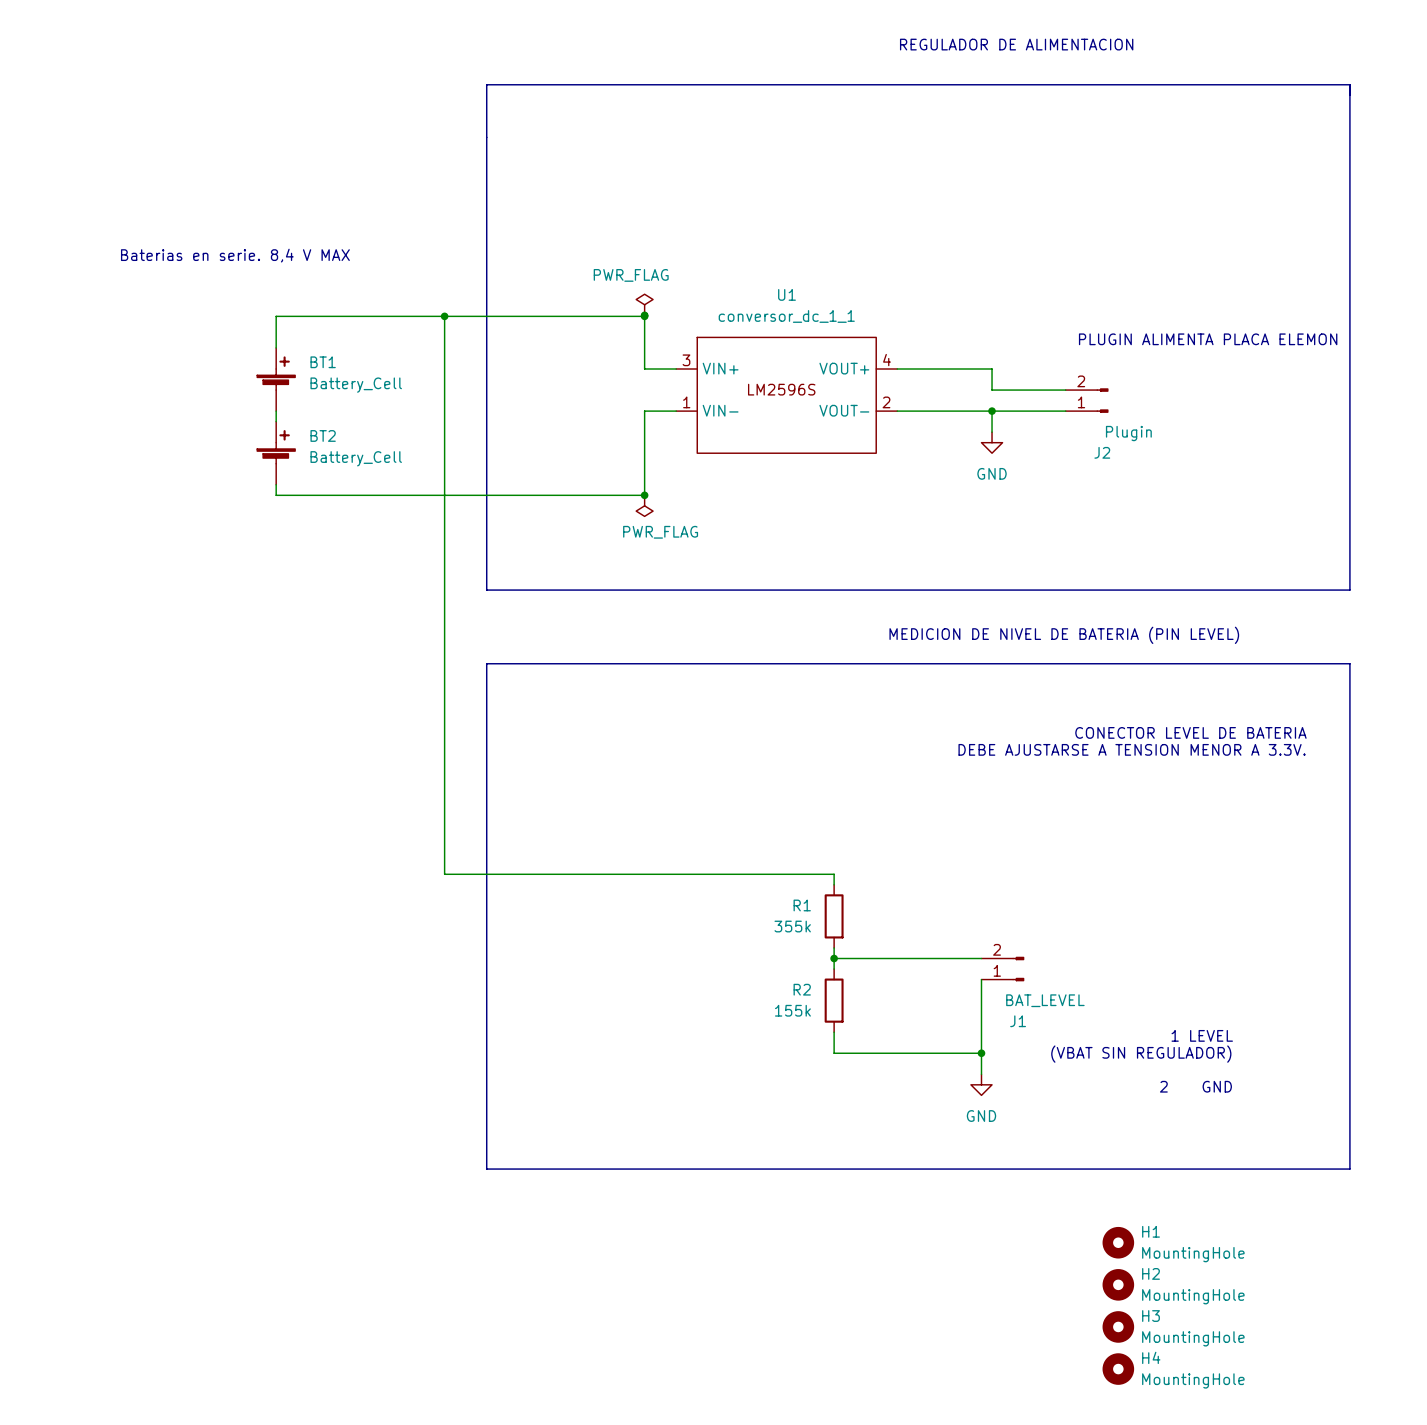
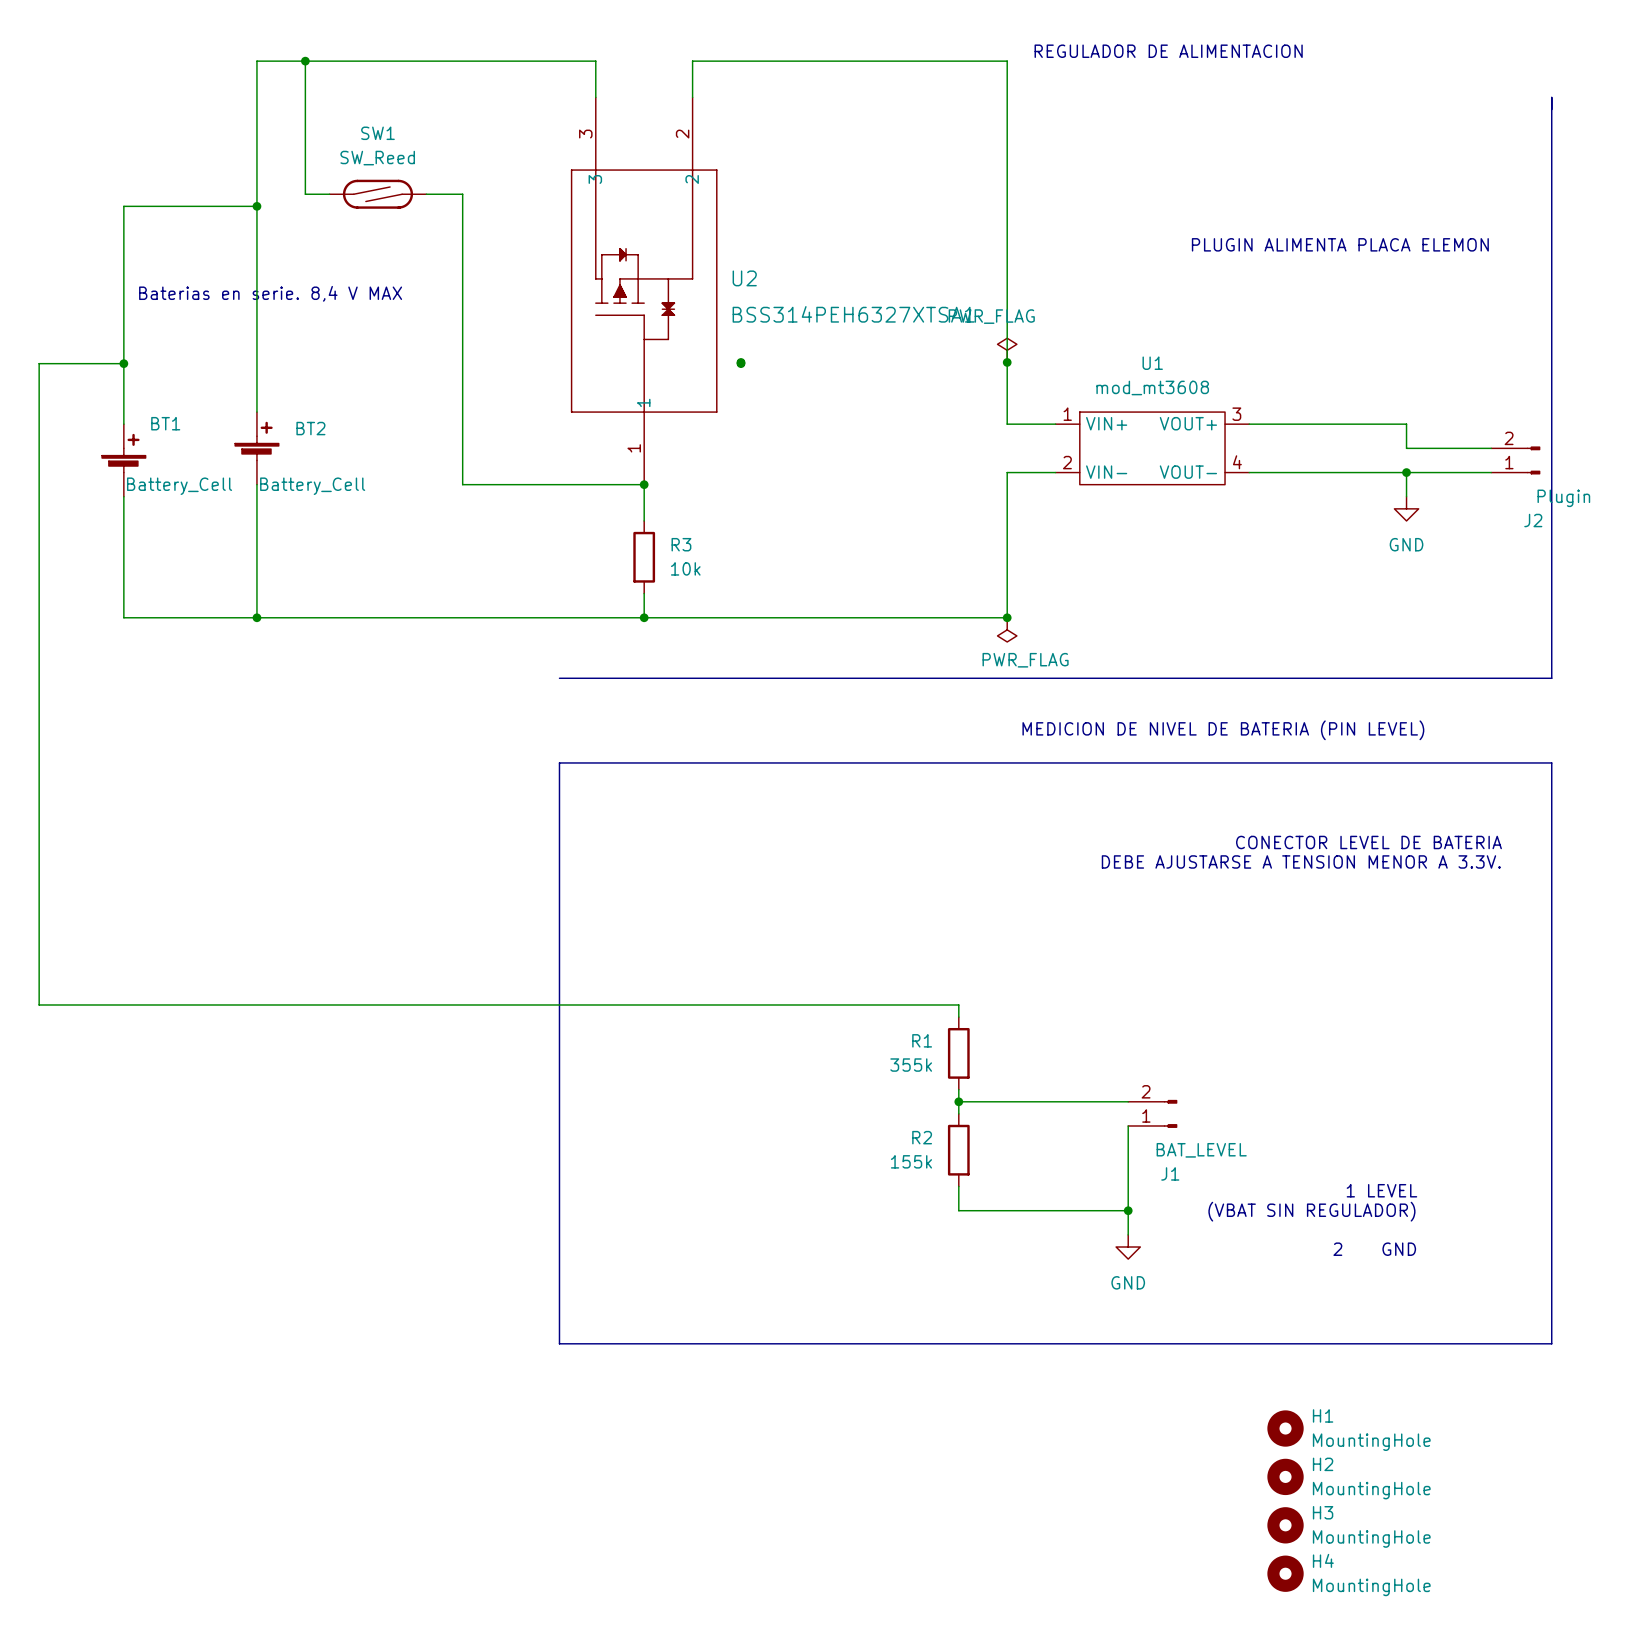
wire: none -> (305, 61) (305, 194) (329, 194)
junction: none -> (305, 61)
wire: none -> (595, 97) (595, 61) (256, 61) (256, 412)
wire: none -> (692, 97) (692, 61) (1007, 61) (1007, 424) (1031, 424)
line: (1349, 84) (486, 84) (486, 590) -> none
SW1: none -> SW_Reed (377, 194)
wire: none -> (426, 194) (462, 194) (462, 484) (644, 484) (644, 520)
wire: none -> (256, 206) (123, 206) (123, 424)
junction: none -> (256, 206)
U2: none -> BSS314PEH6327XTSA1 (644, 291)
U1 name position: U1 (786, 294) -> U1 (1152, 363)
power symbol: PWR_FLAG (644, 304) -> none
power symbol: none -> PWR_FLAG (1007, 350)
wire: (644, 315) (644, 368) (676, 368) -> none
junction: none -> (1007, 362)
junction: none -> (123, 363)
wire: (444, 316) (444, 874) -> (123, 363) (39, 363) (39, 1004) (511, 1004)
junction: (444, 316) -> none
wire: (644, 316) (276, 316) (276, 347) -> none
U1 value: conversor_dc_1_1 (786, 316) -> mod_mt3608 (1152, 387)
U1 symbol: [676, 337, 898, 454] -> [1055, 412, 1250, 485]
text position: PLUGIN ALIMENTA PLACA ELEMON (1208, 339) -> PLUGIN ALIMENTA PLACA ELEMON (1340, 244)
BT1 name position: BT1 (323, 362) -> BT1 (165, 423)
wire: (918, 368) (992, 368) (992, 390) (1065, 390) -> none
wire: none -> (1249, 424) (1406, 424) (1406, 448) (1491, 448)
BT1 position: (276, 379) -> (123, 460)
BT1 value position: Battery_Cell (356, 385) -> Battery_Cell (179, 486)
J2 position: (1087, 400) -> (1515, 460)
wire: (276, 411) (276, 421) -> none
wire: (676, 411) (644, 411) (644, 495) (276, 495) (276, 484) -> none
wire: none -> (1031, 472) (1007, 472) (1007, 617) (123, 617) (123, 496)
wire: (918, 411) (1065, 411) -> none
wire: (992, 411) (992, 432) -> none
junction: (992, 411) -> none
wire: none -> (1249, 472) (1491, 472)
wire: none -> (1406, 472) (1406, 496)
junction: none -> (1406, 472)
wire: none -> (256, 484) (256, 617)
junction: none -> (644, 484)
power symbol: GND (992, 442) -> none
power symbol: none -> GND (1406, 508)
BT2 position: (276, 453) -> (256, 448)
BT2 value position: Battery_Cell (356, 458) -> Battery_Cell (312, 486)
R3: none -> 10k (644, 557)
junction: (644, 495) -> none
power symbol: PWR_FLAG (644, 505) -> none
wire: none -> (644, 593) (644, 617)
junction: none -> (256, 617)
junction: none -> (644, 617)
junction: none -> (1007, 617)
power symbol: none -> PWR_FLAG (1007, 629)

